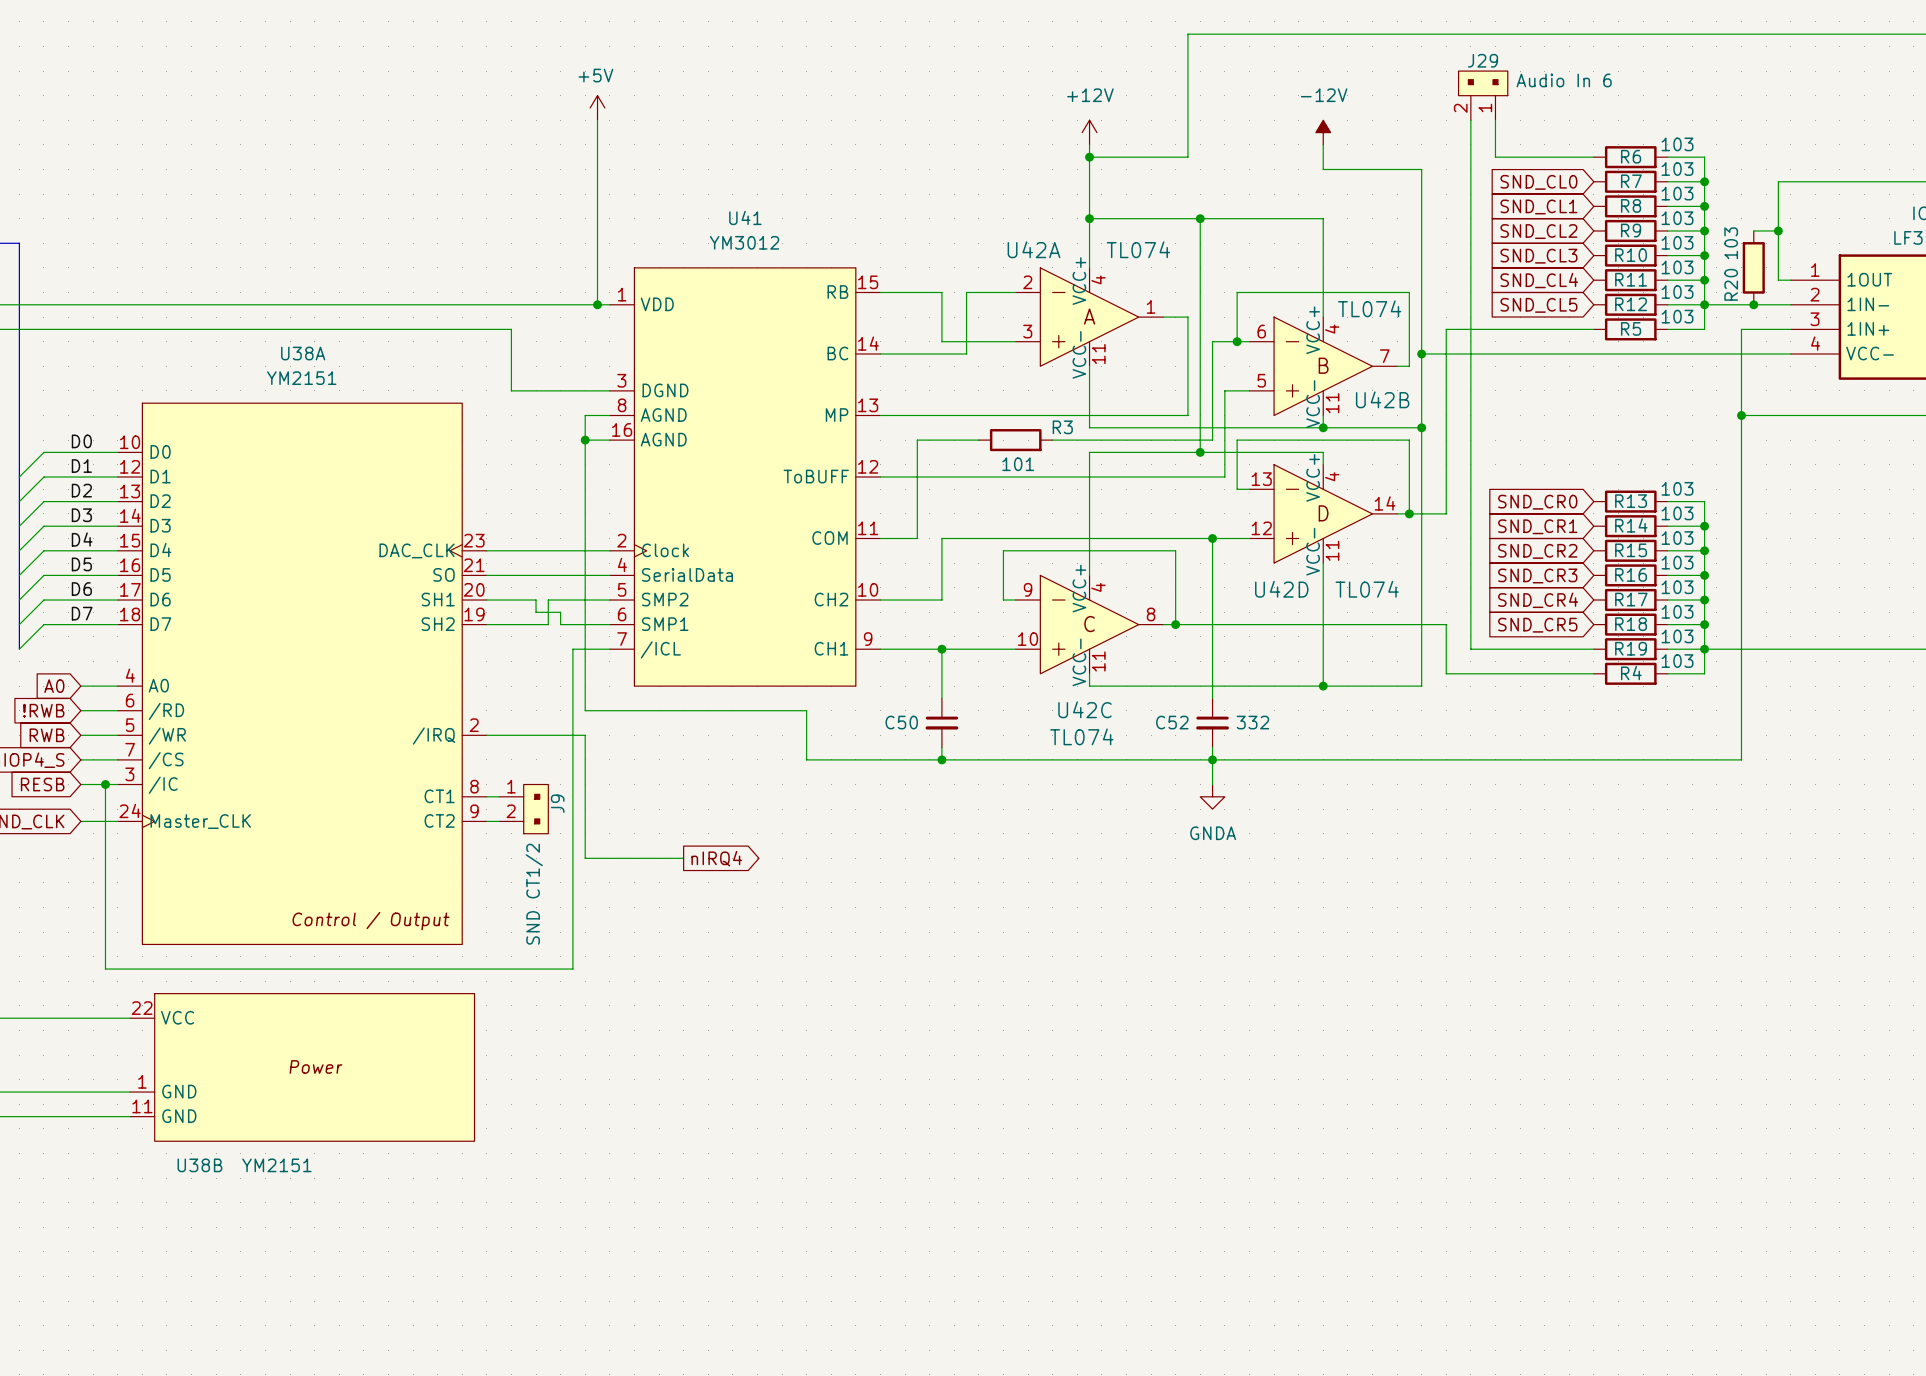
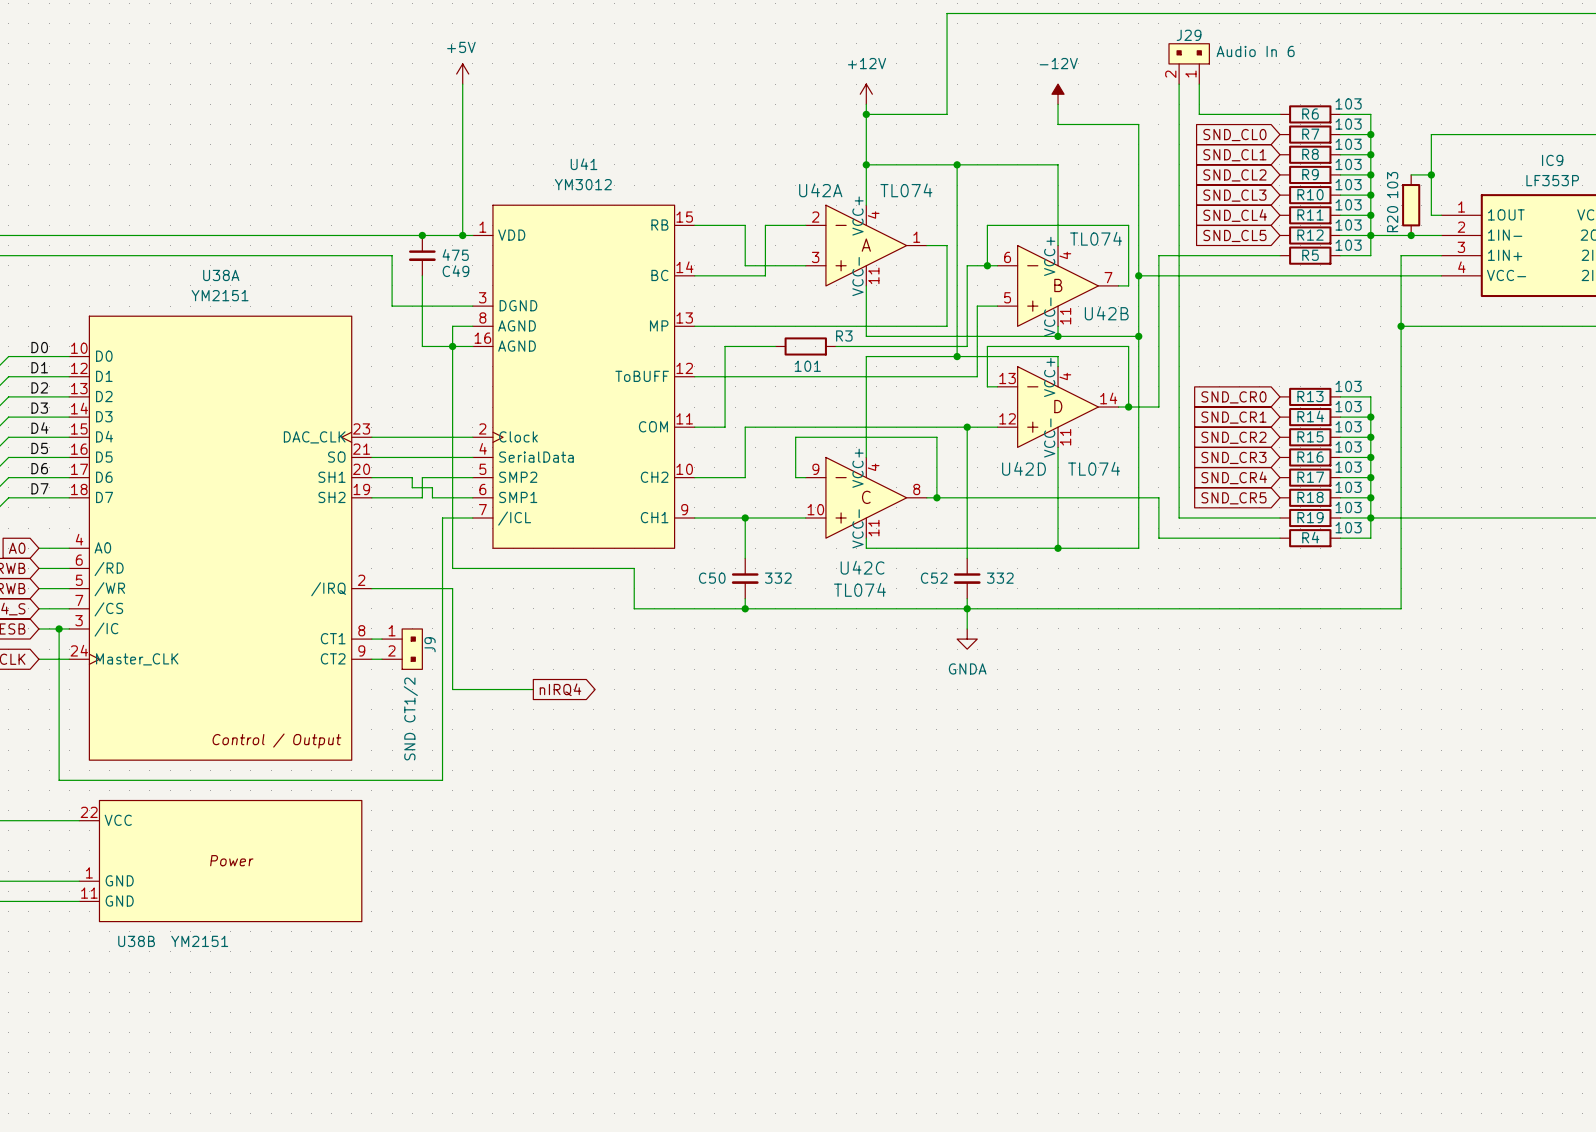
junction: none -> (422, 235)
C49: none -> 475 (422, 255)
wire: none -> (422, 275) (422, 346) (452, 346)
C50 value: none -> 332 (778, 578)

